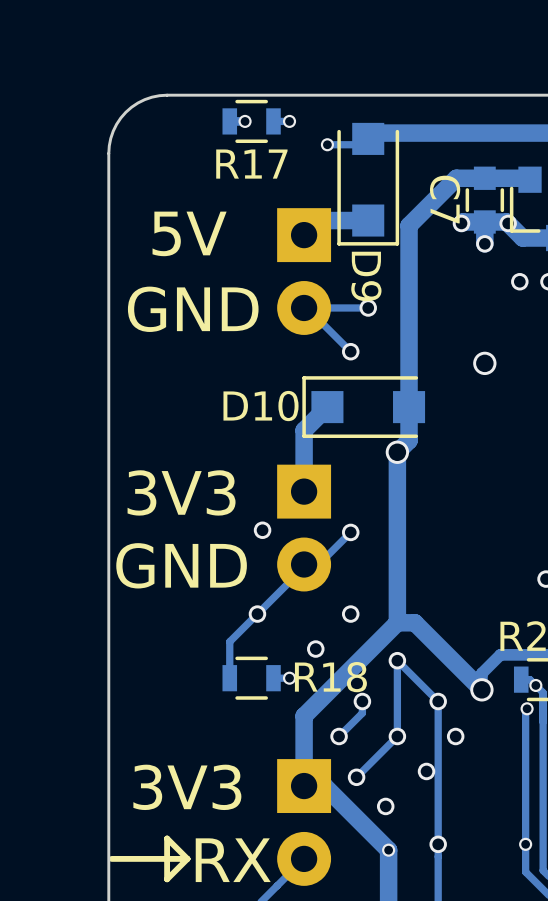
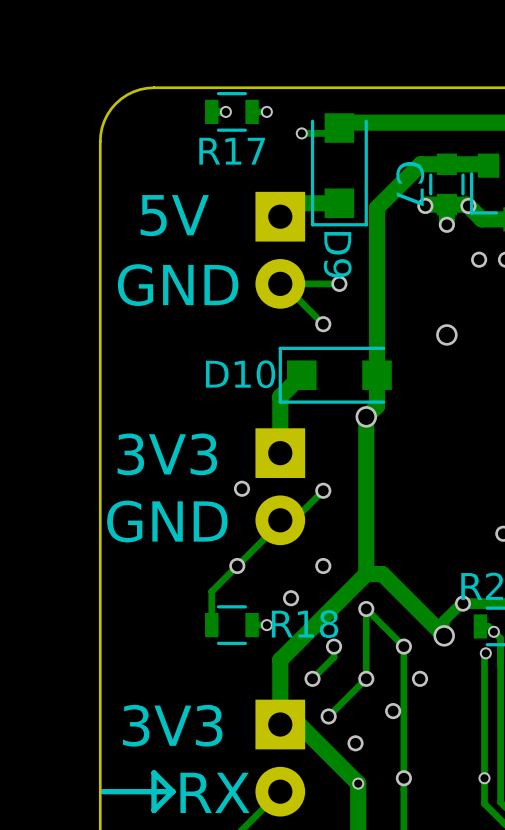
via: none -> (463, 603)

